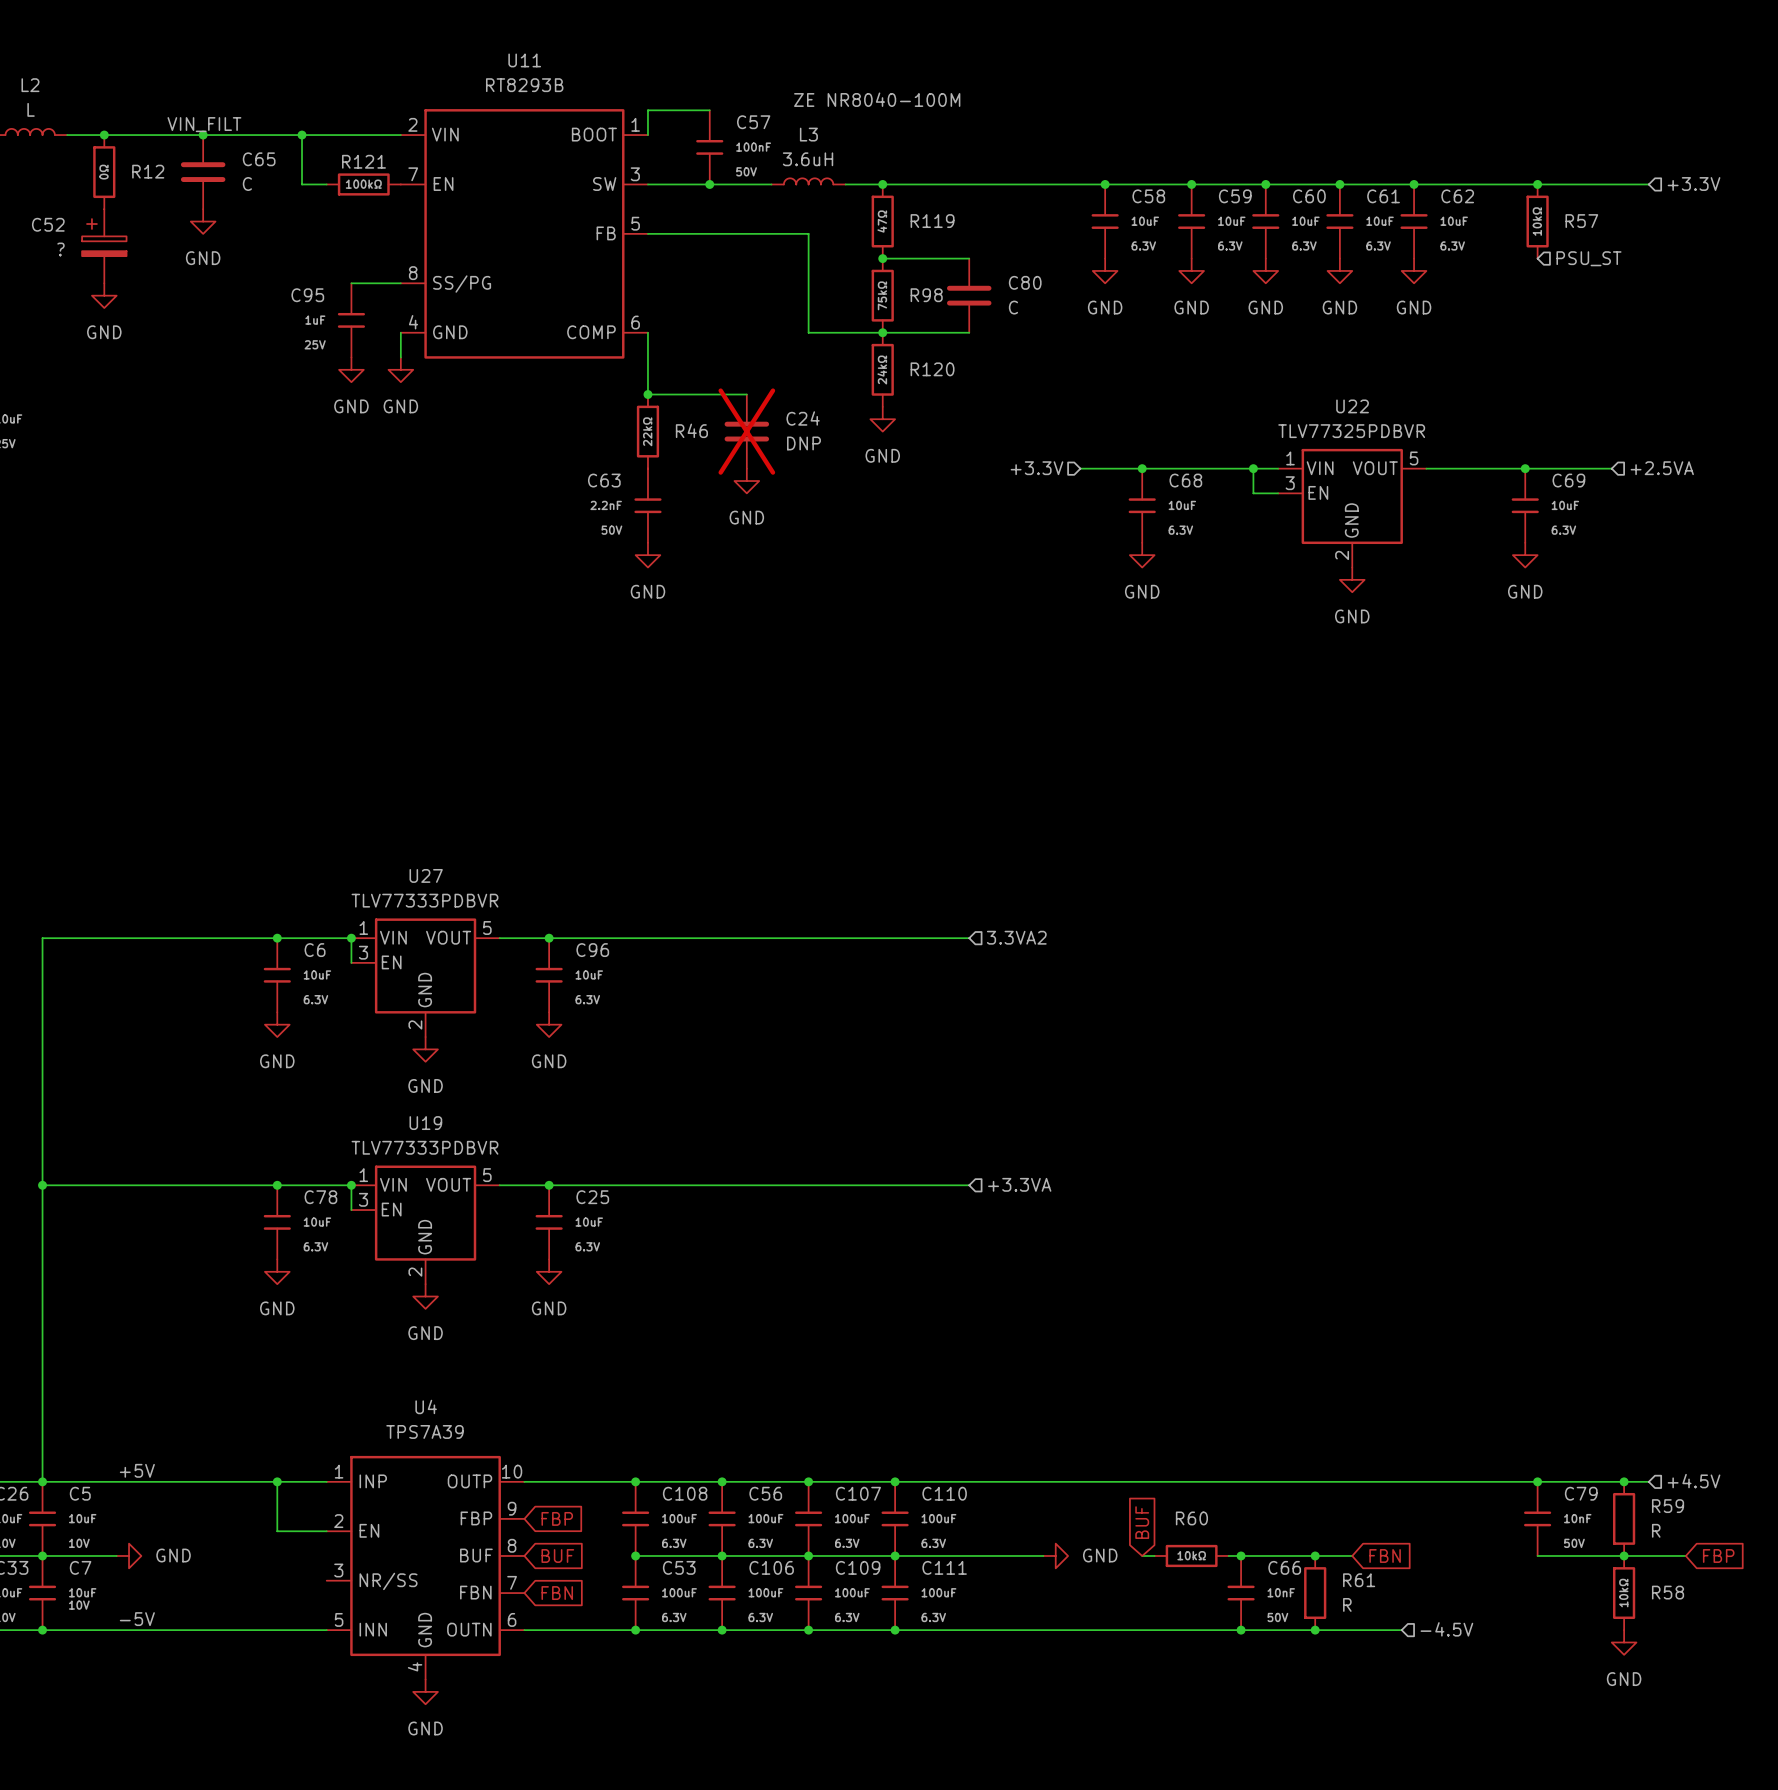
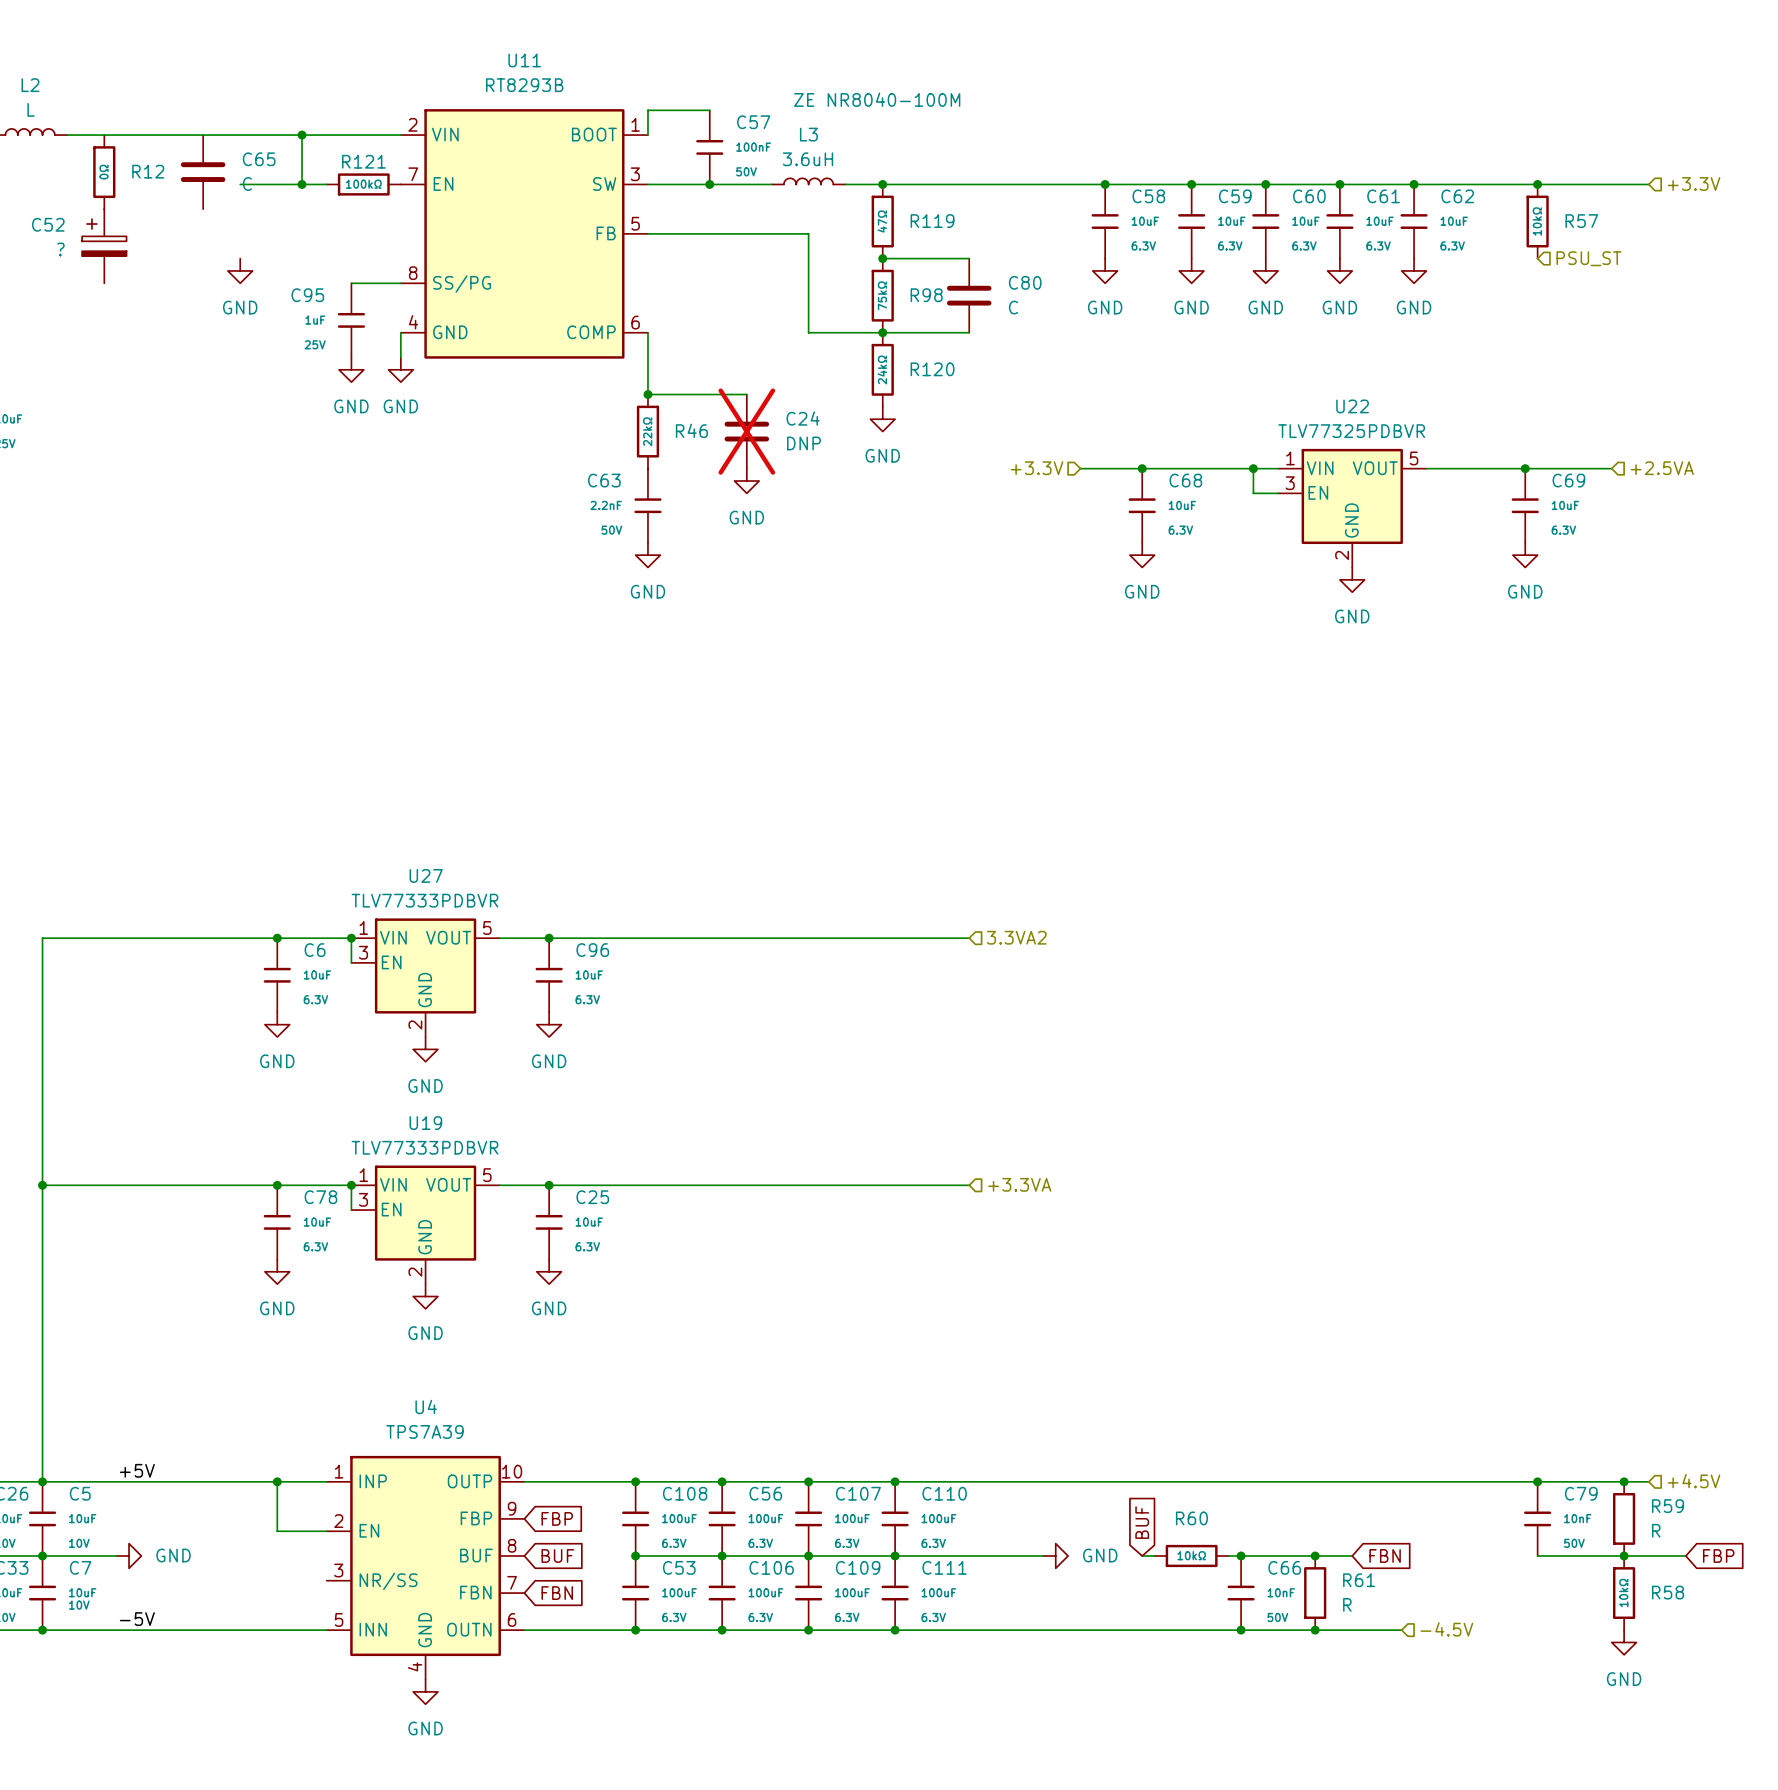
label: VIN_FILT (204, 124) -> none
junction: (104, 135) -> none
junction: (203, 135) -> none
wire: none -> (240, 184) (302, 184)
junction: none -> (302, 184)
power symbol position: GND (203, 221) -> GND (240, 270)
power symbol: GND (104, 295) -> none

